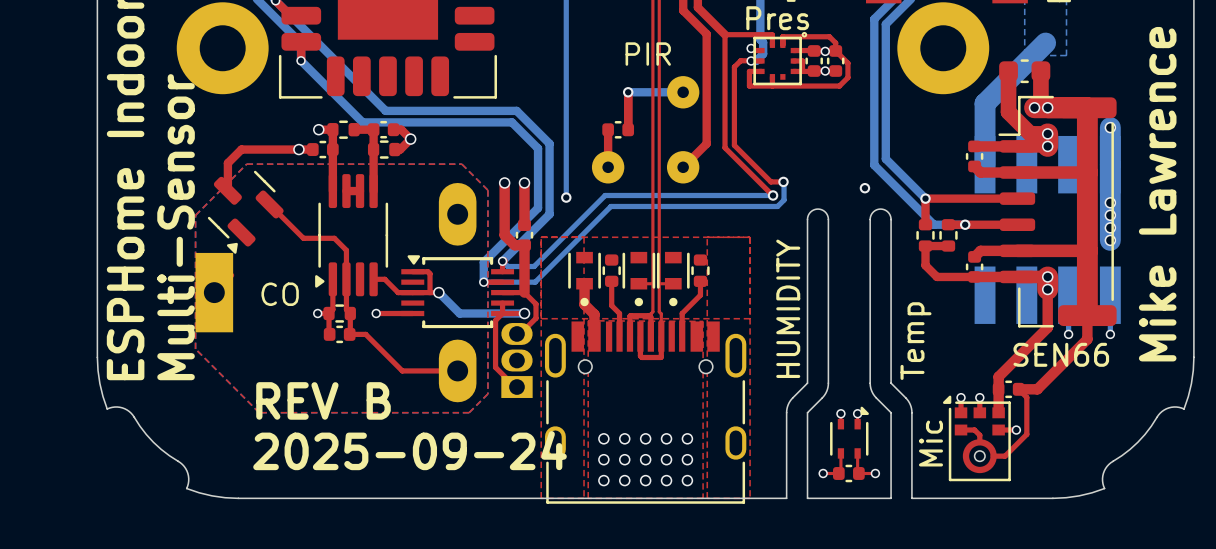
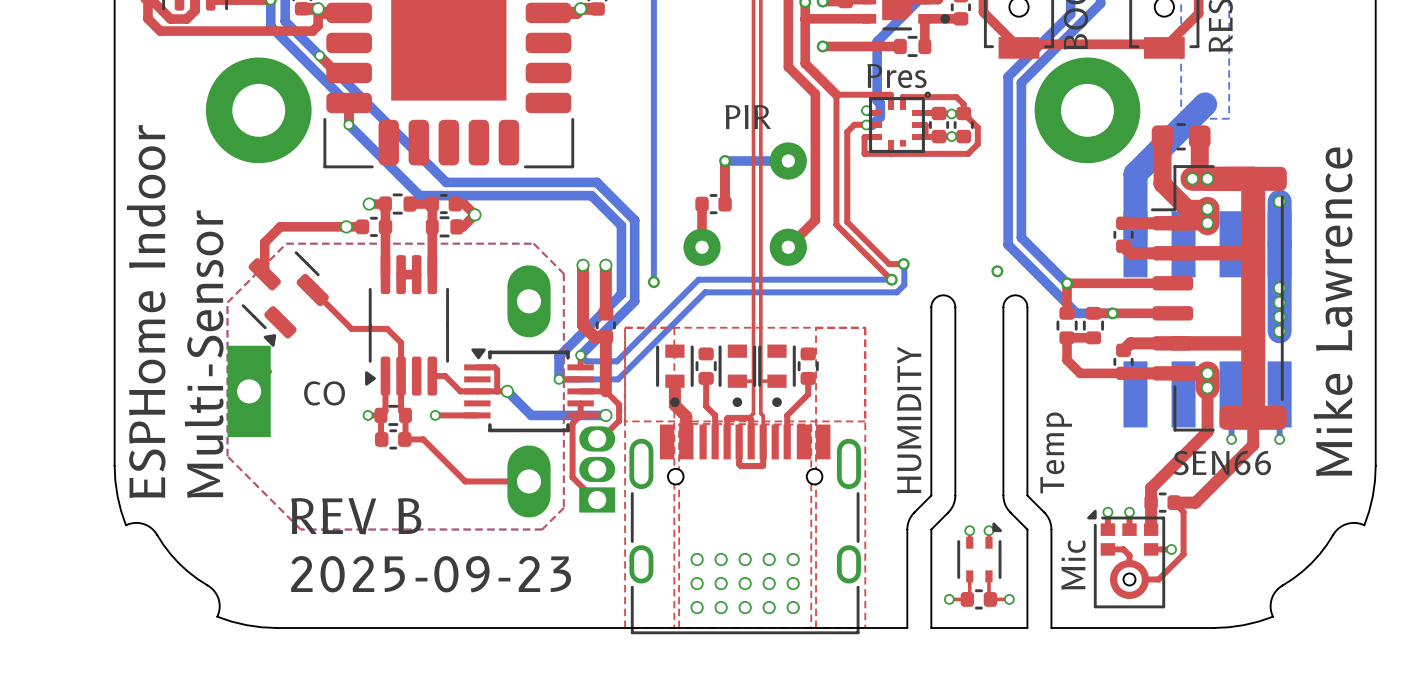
text: 2025-09-24 (410, 450) -> 2025-09-23 (431, 574)

